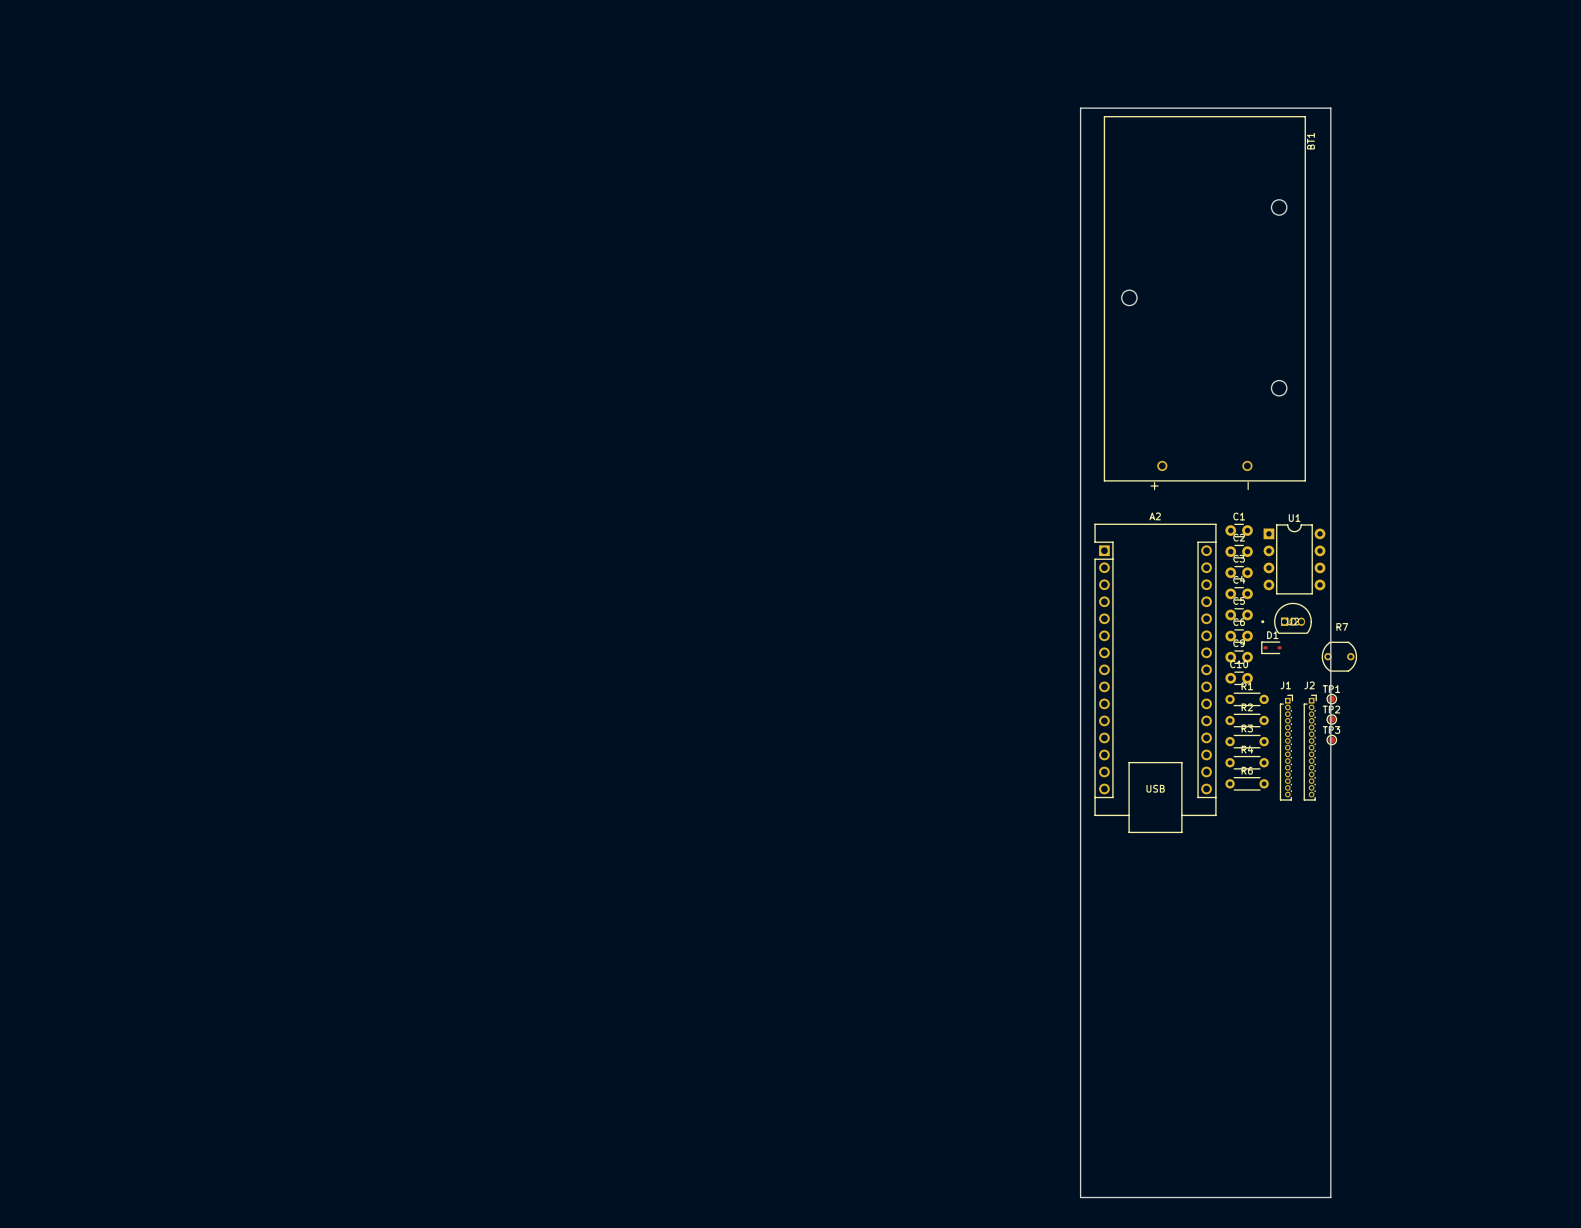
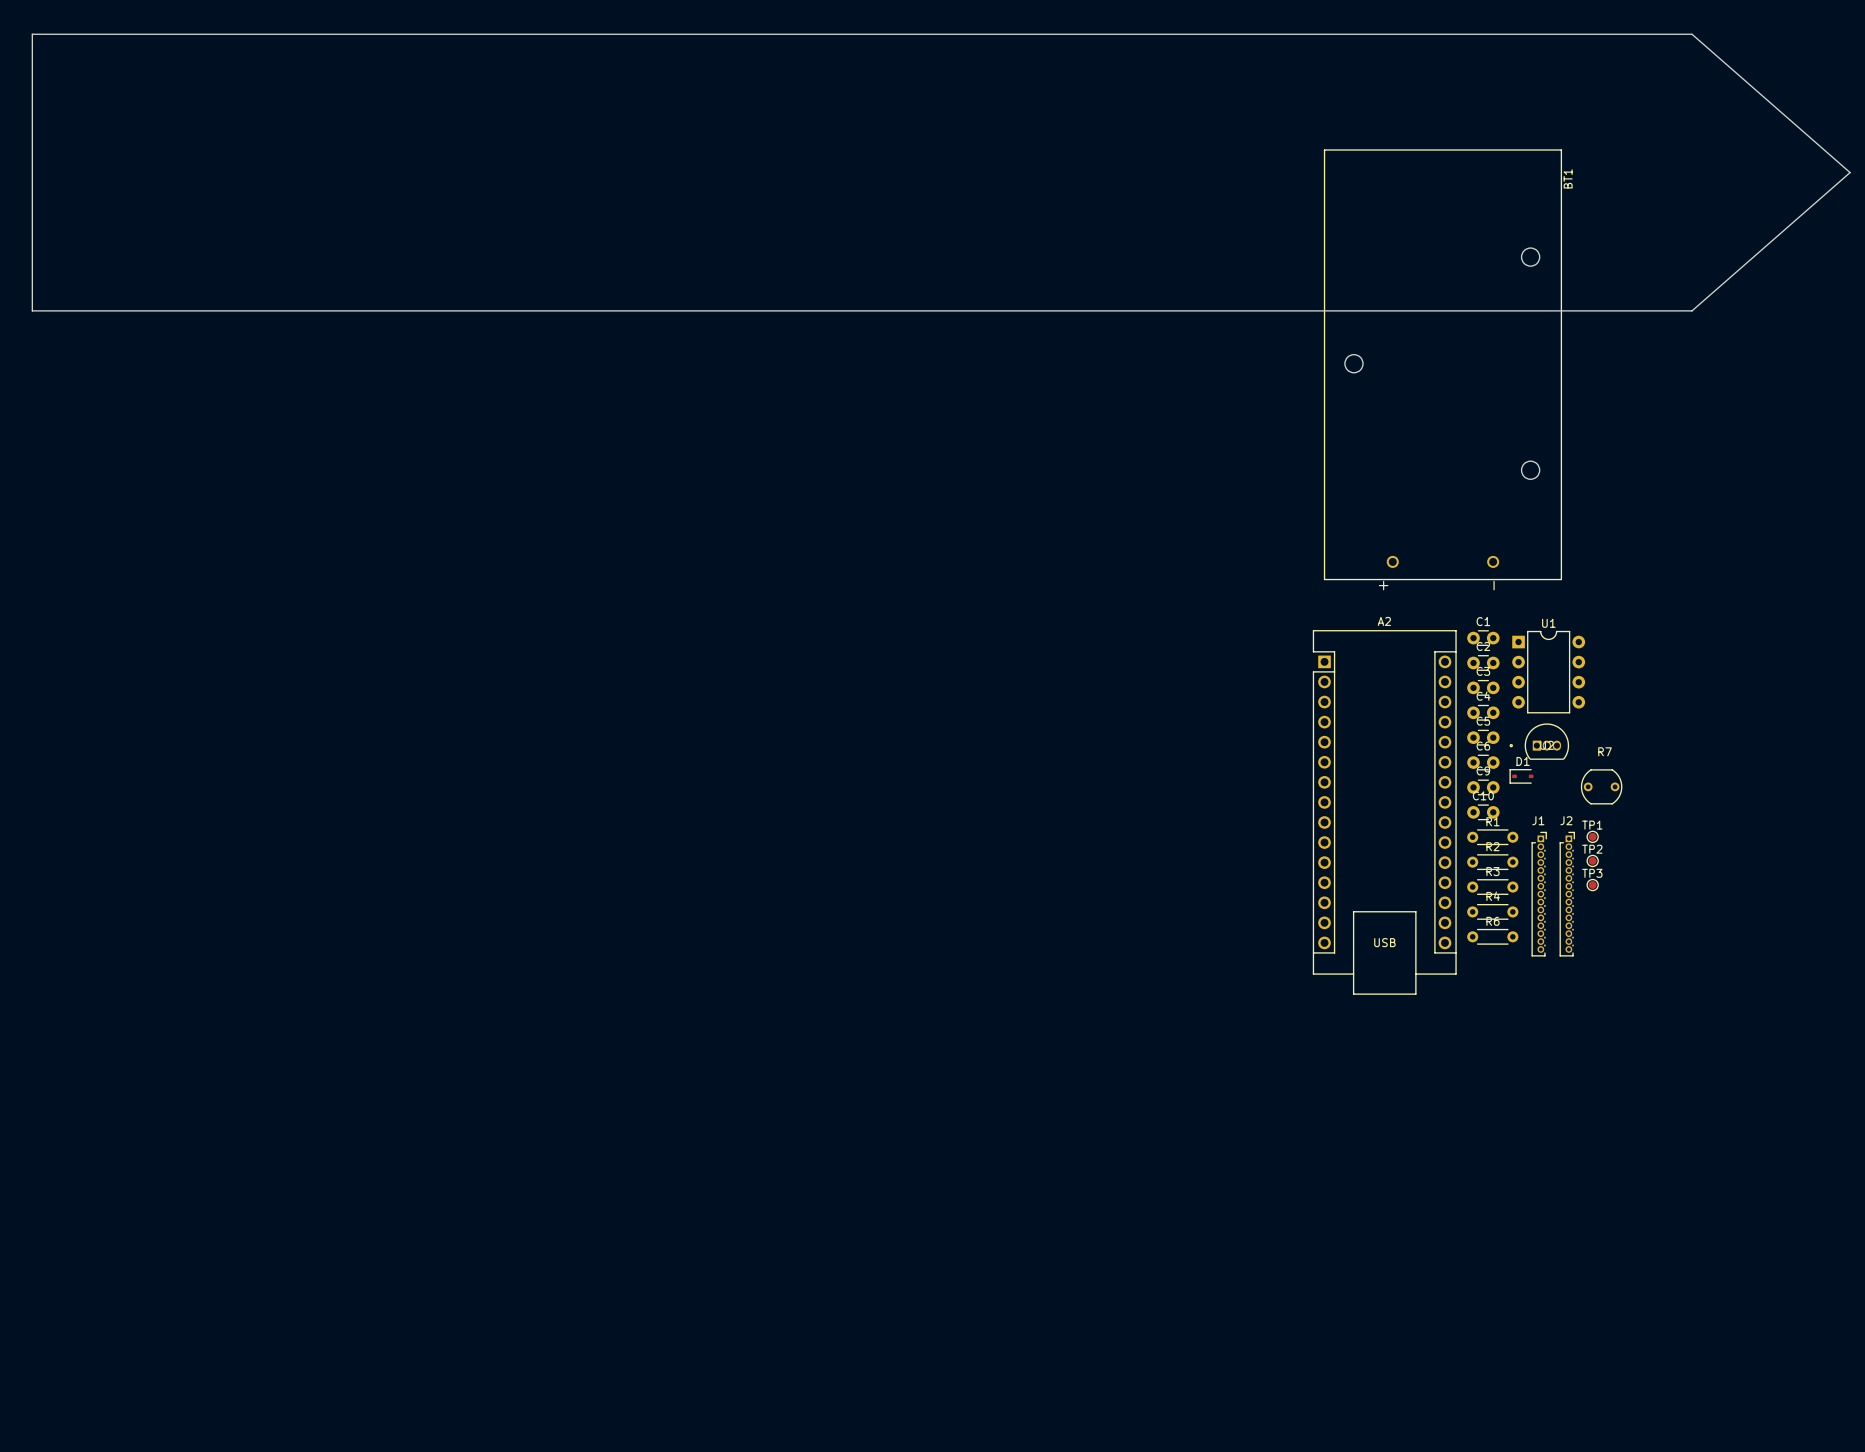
board edge: none -> (32, 34) (32, 310) (1692, 310) (1850, 172) (1692, 34) (32, 34)
board edge: (1080, 108) (1330, 108) (1330, 1197) (1080, 1197) (1080, 108) -> none

